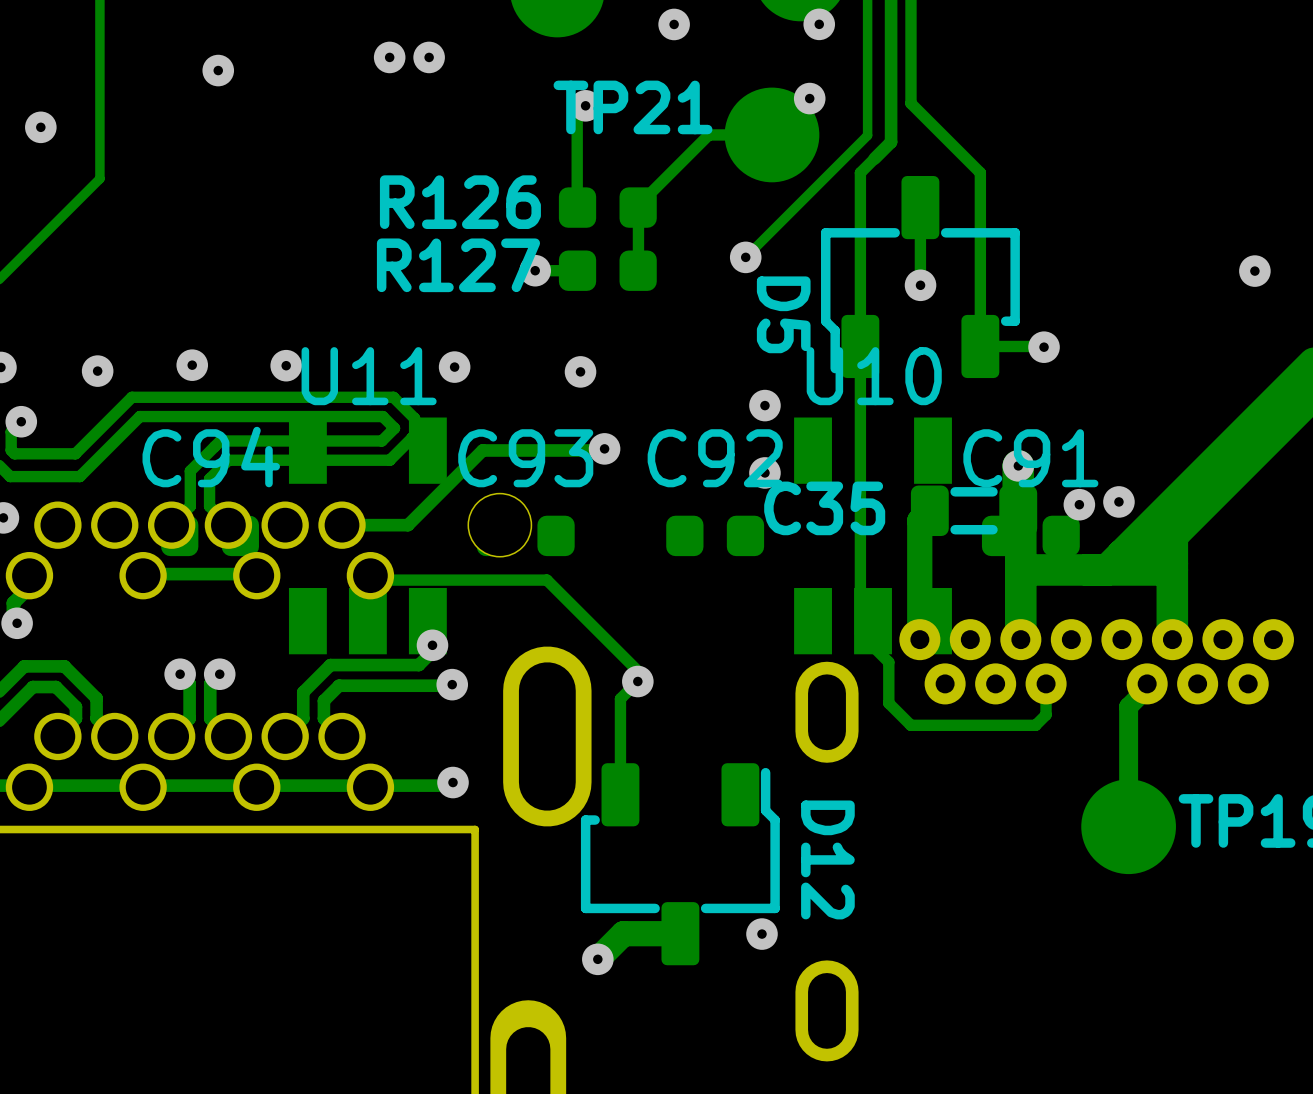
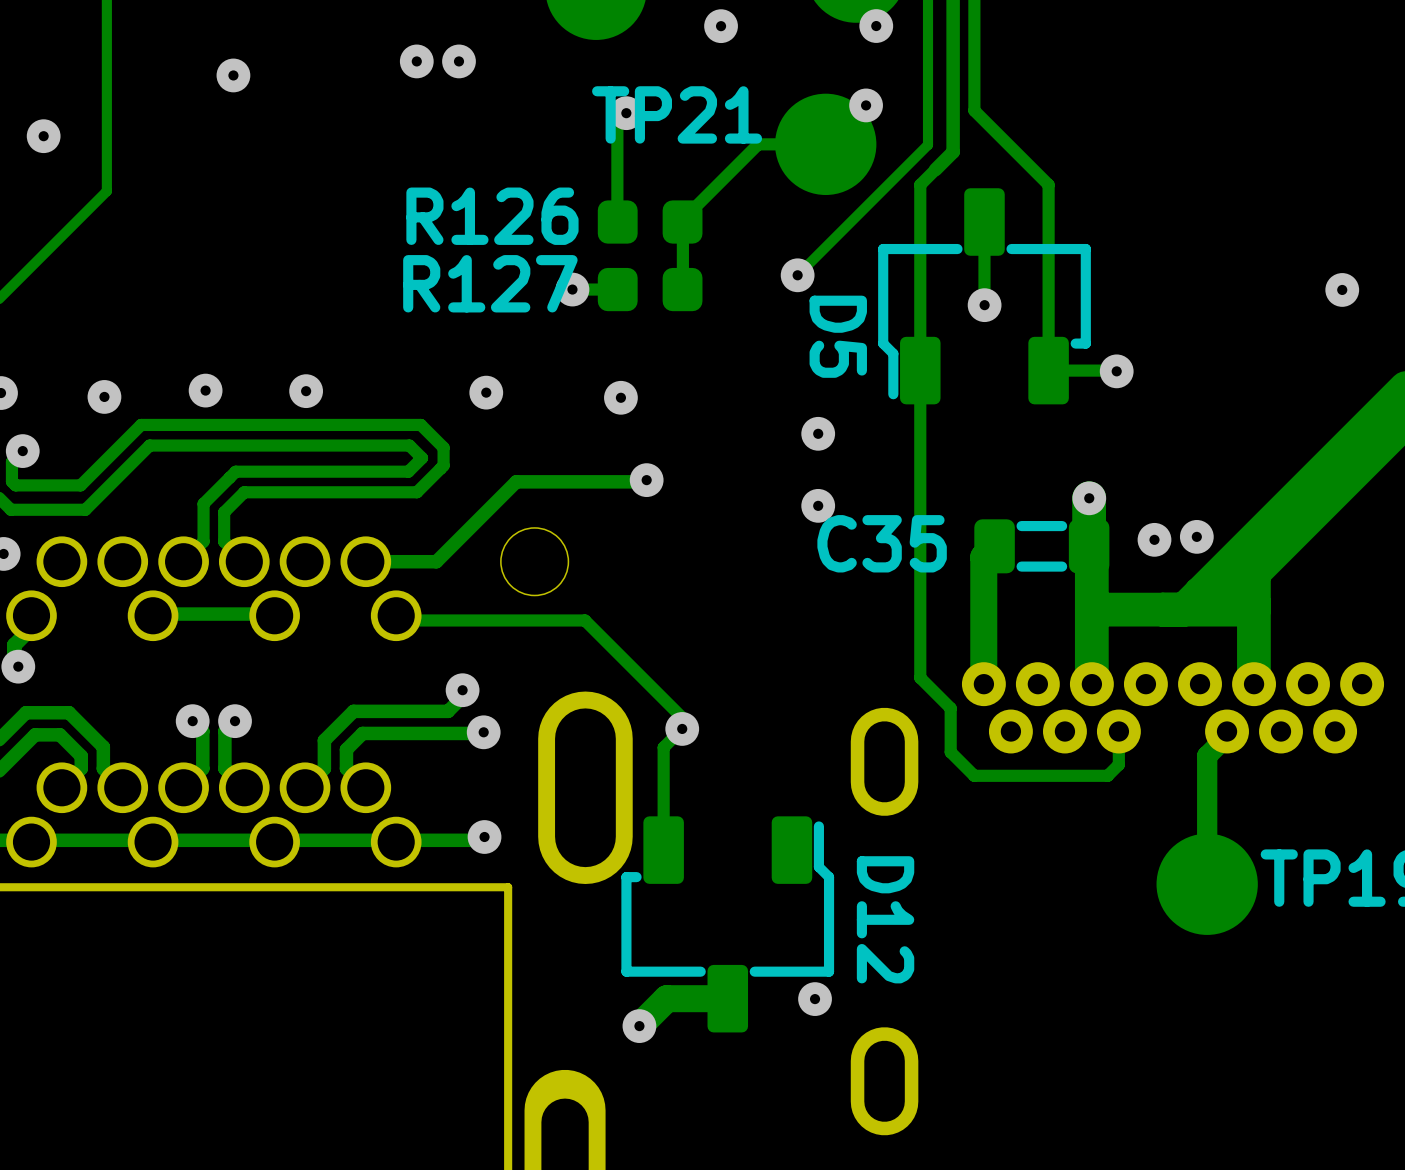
C94: (210, 535) -> none
U11: (367, 535) -> none
C93: (525, 535) -> none
C92: (715, 535) -> none
U10: (873, 535) -> none
C91: (1030, 535) -> none

